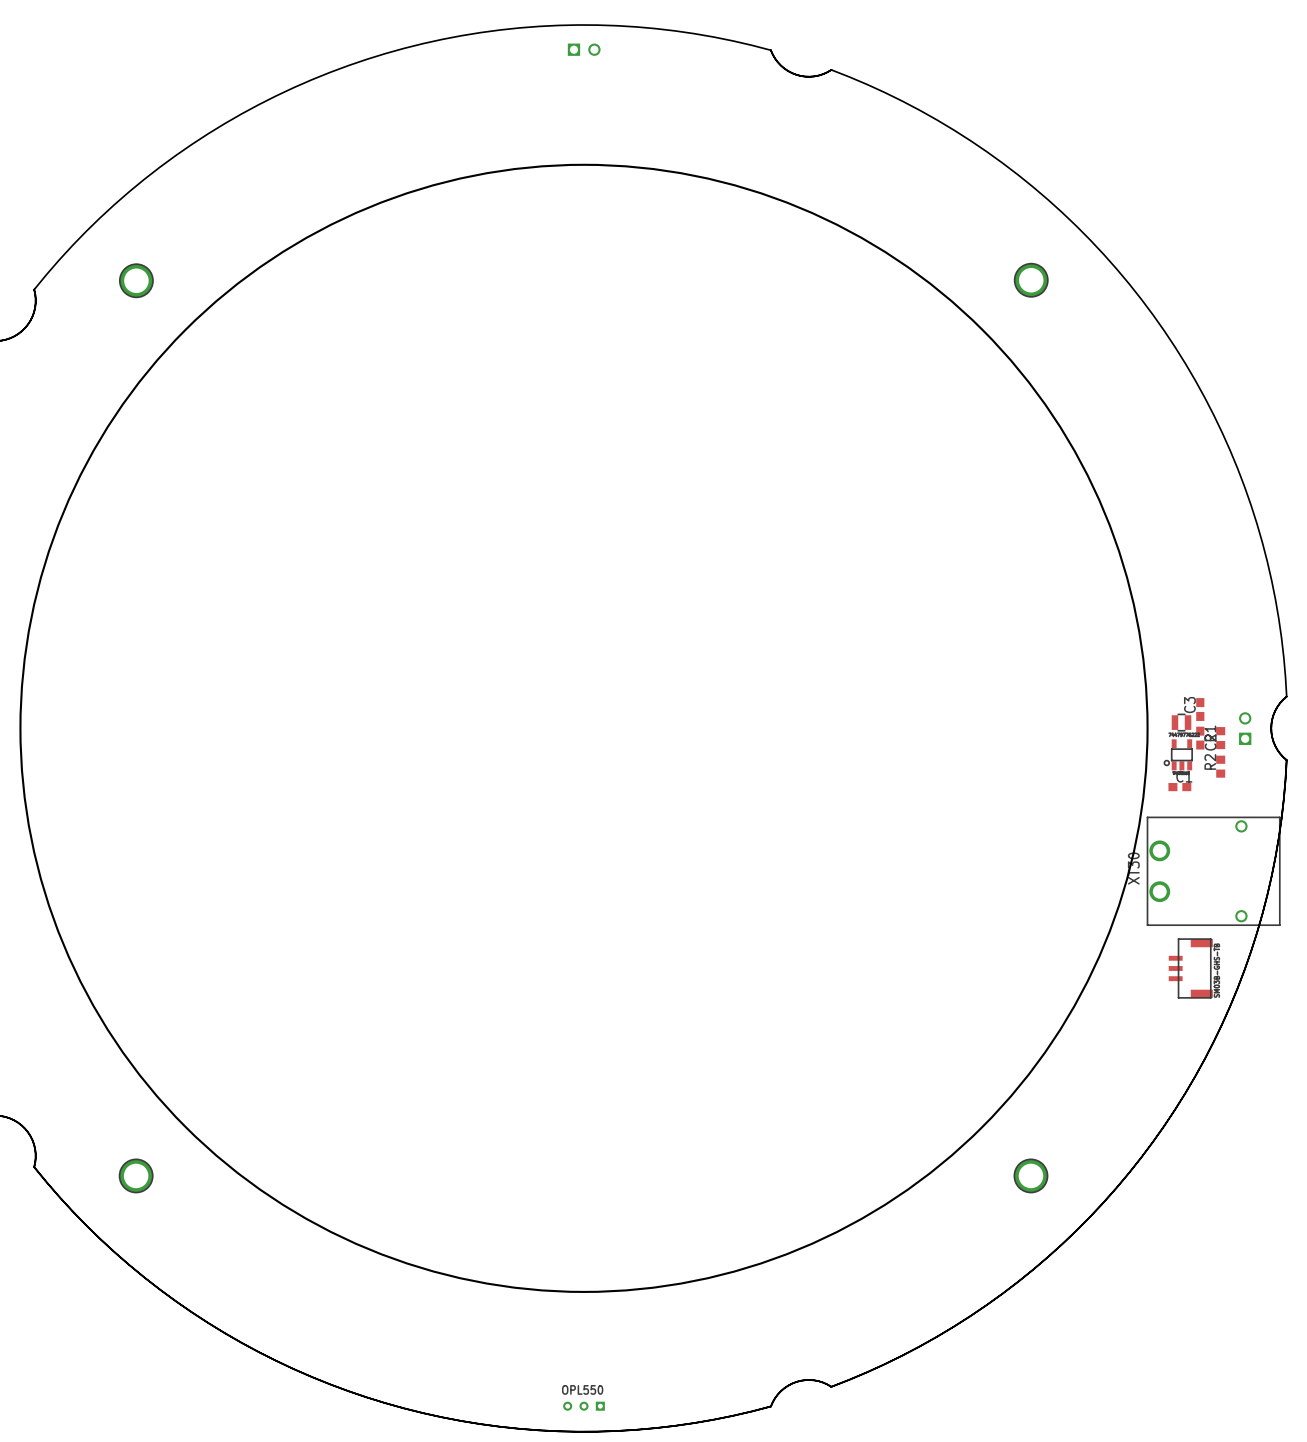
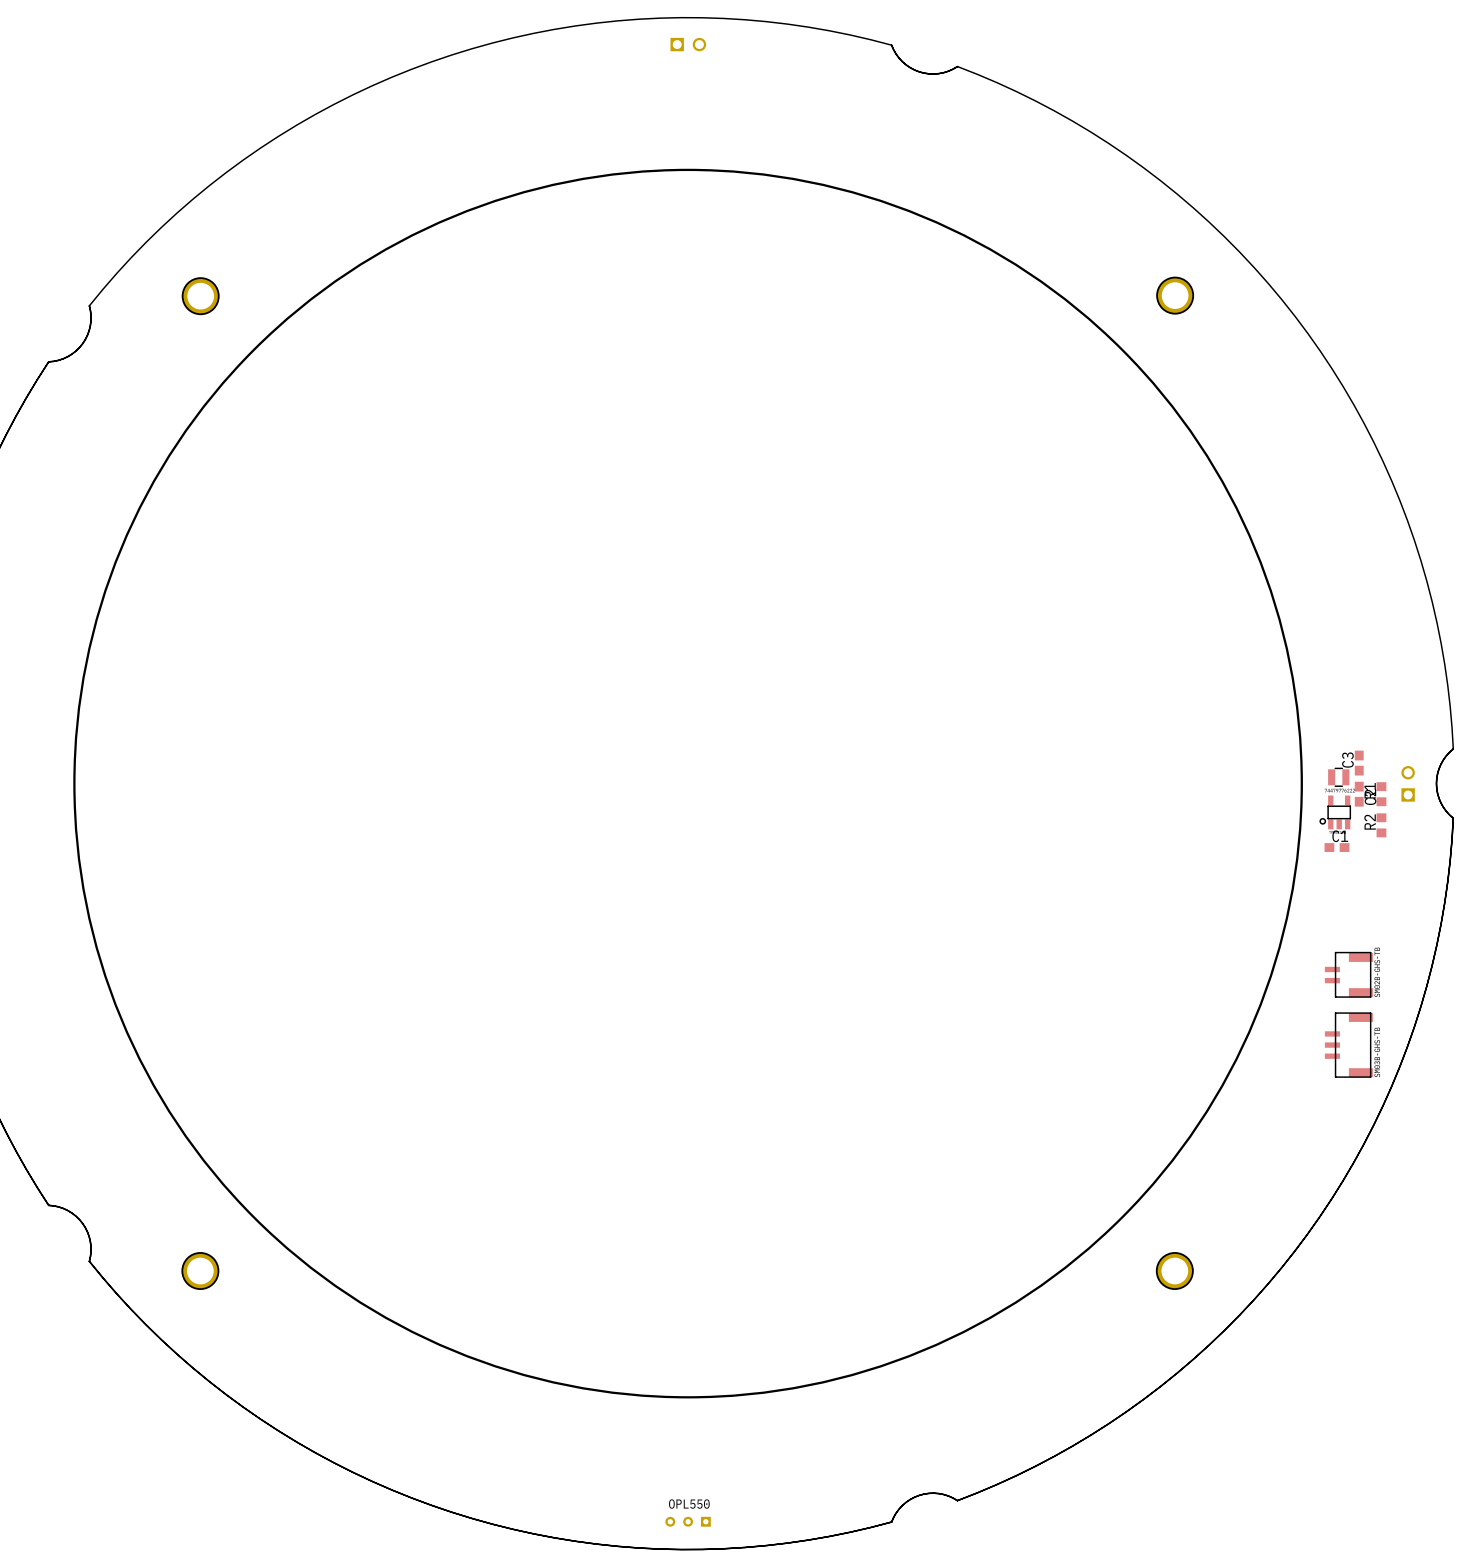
part: (1213, 871) -> none
part: none -> (1348, 974)

